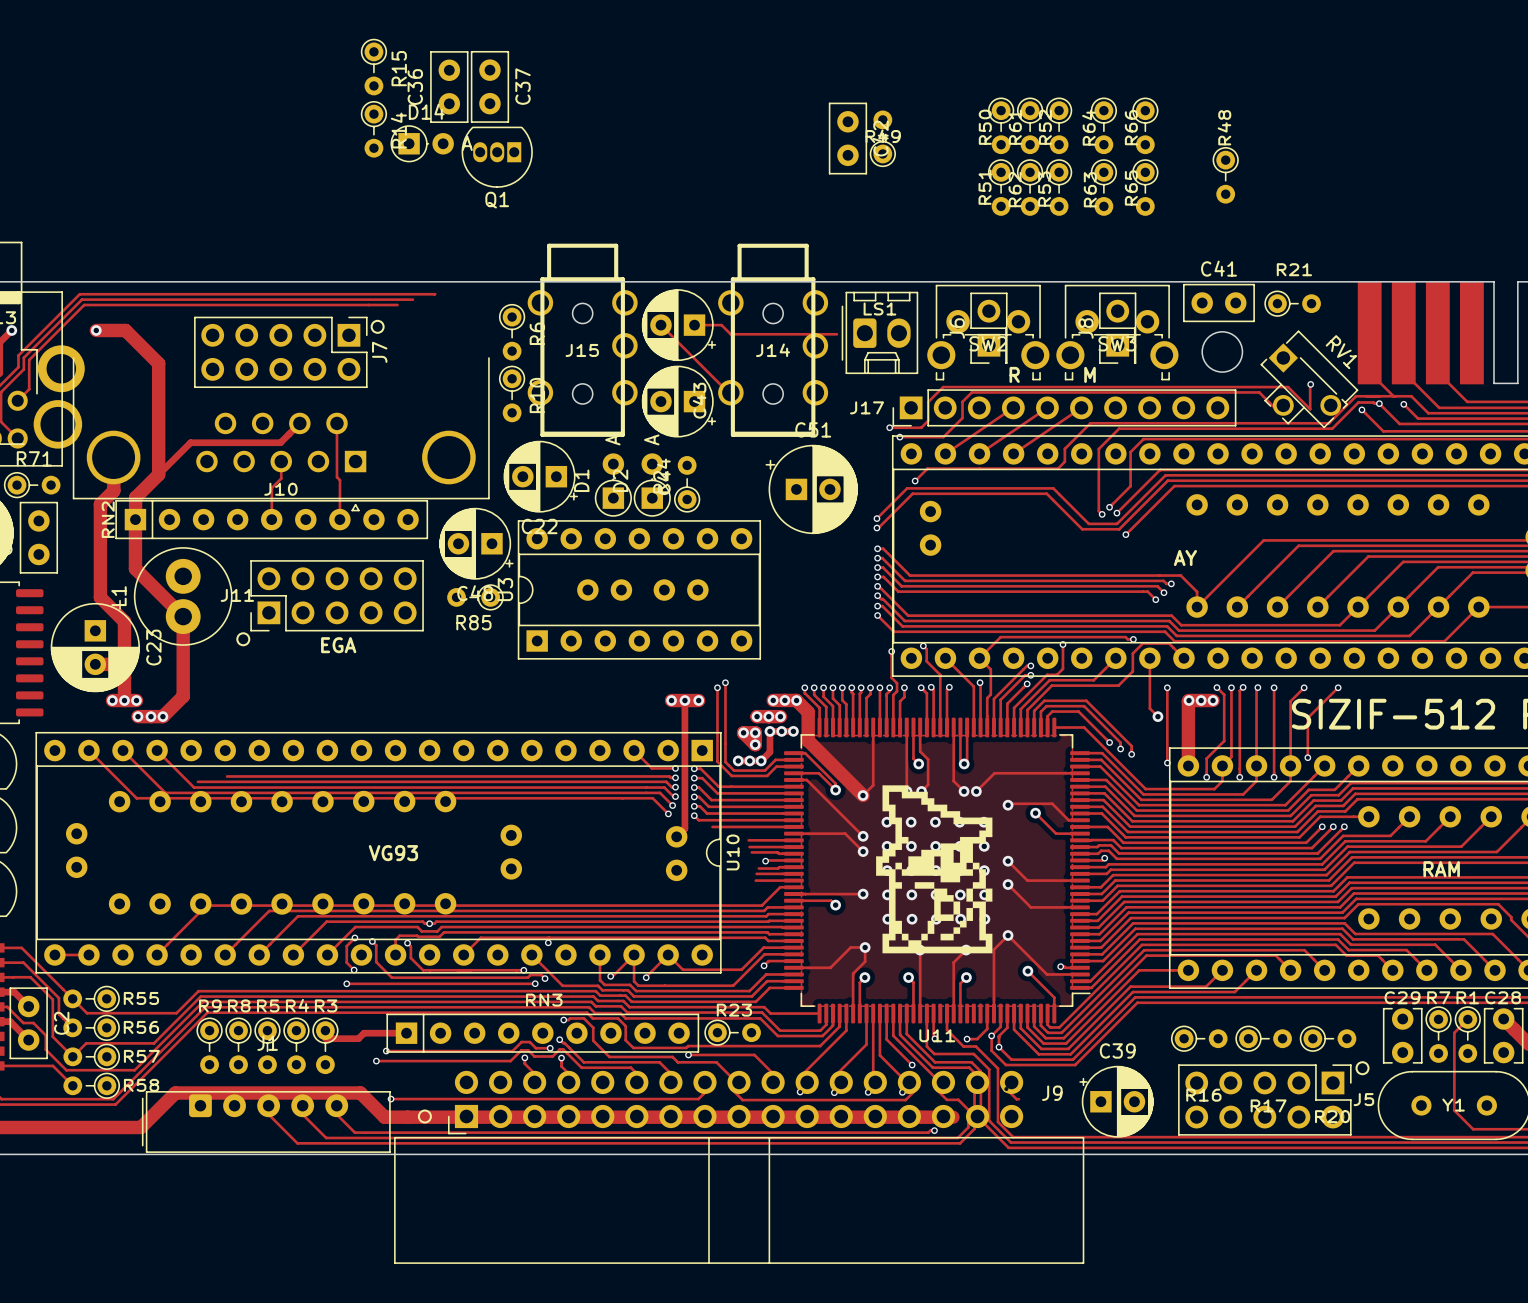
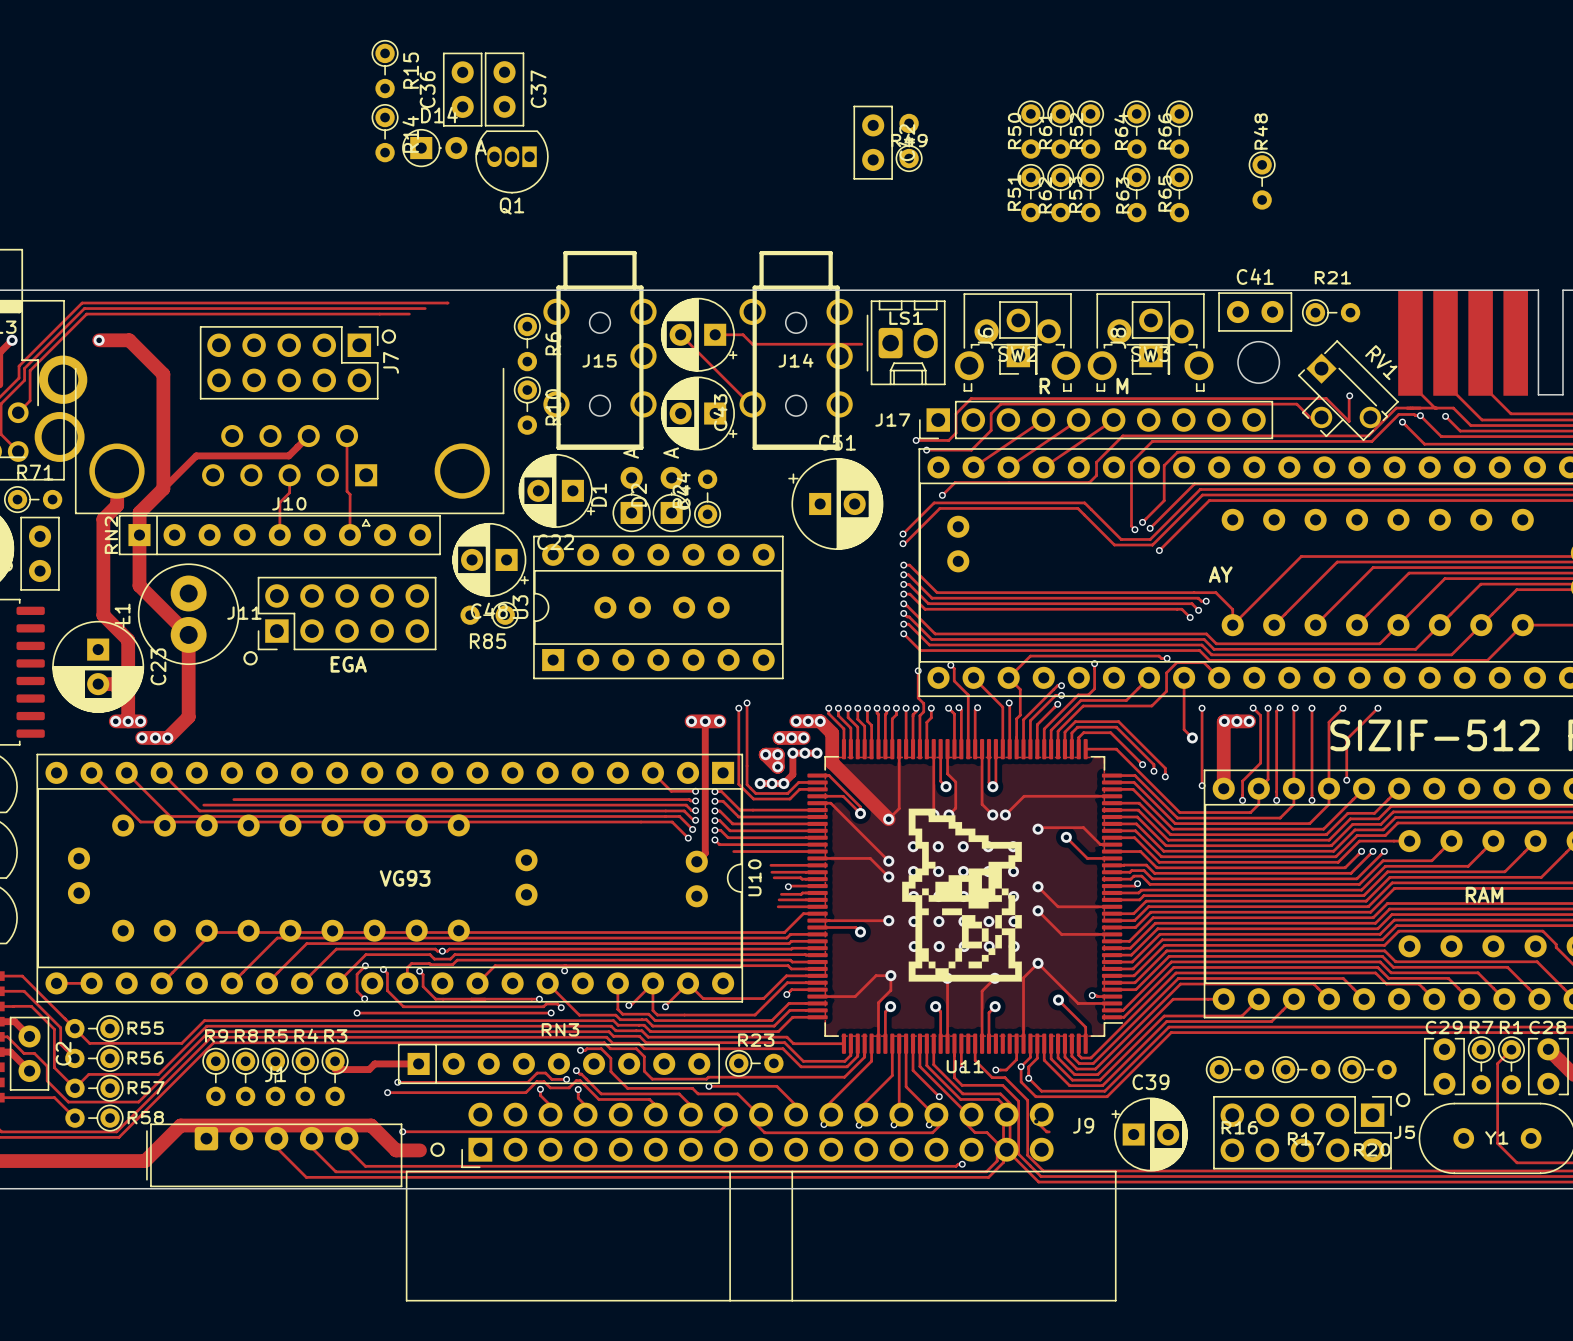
track: (407, 1117) (952, 1117) -> none

